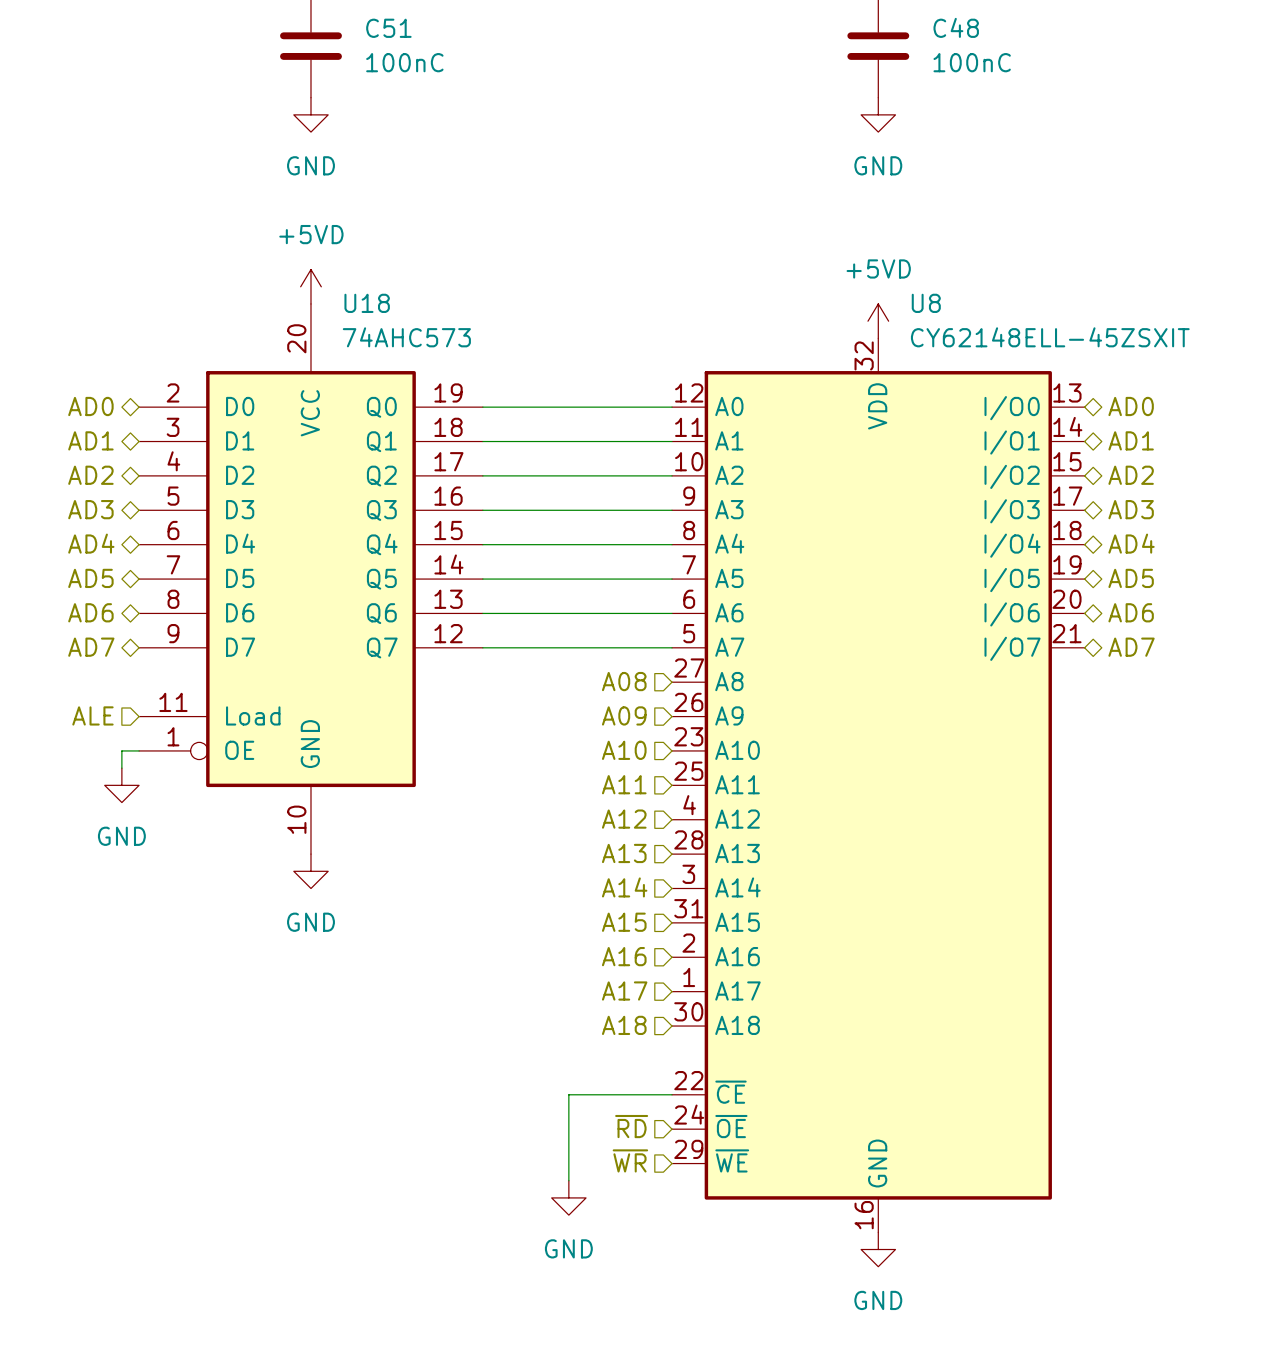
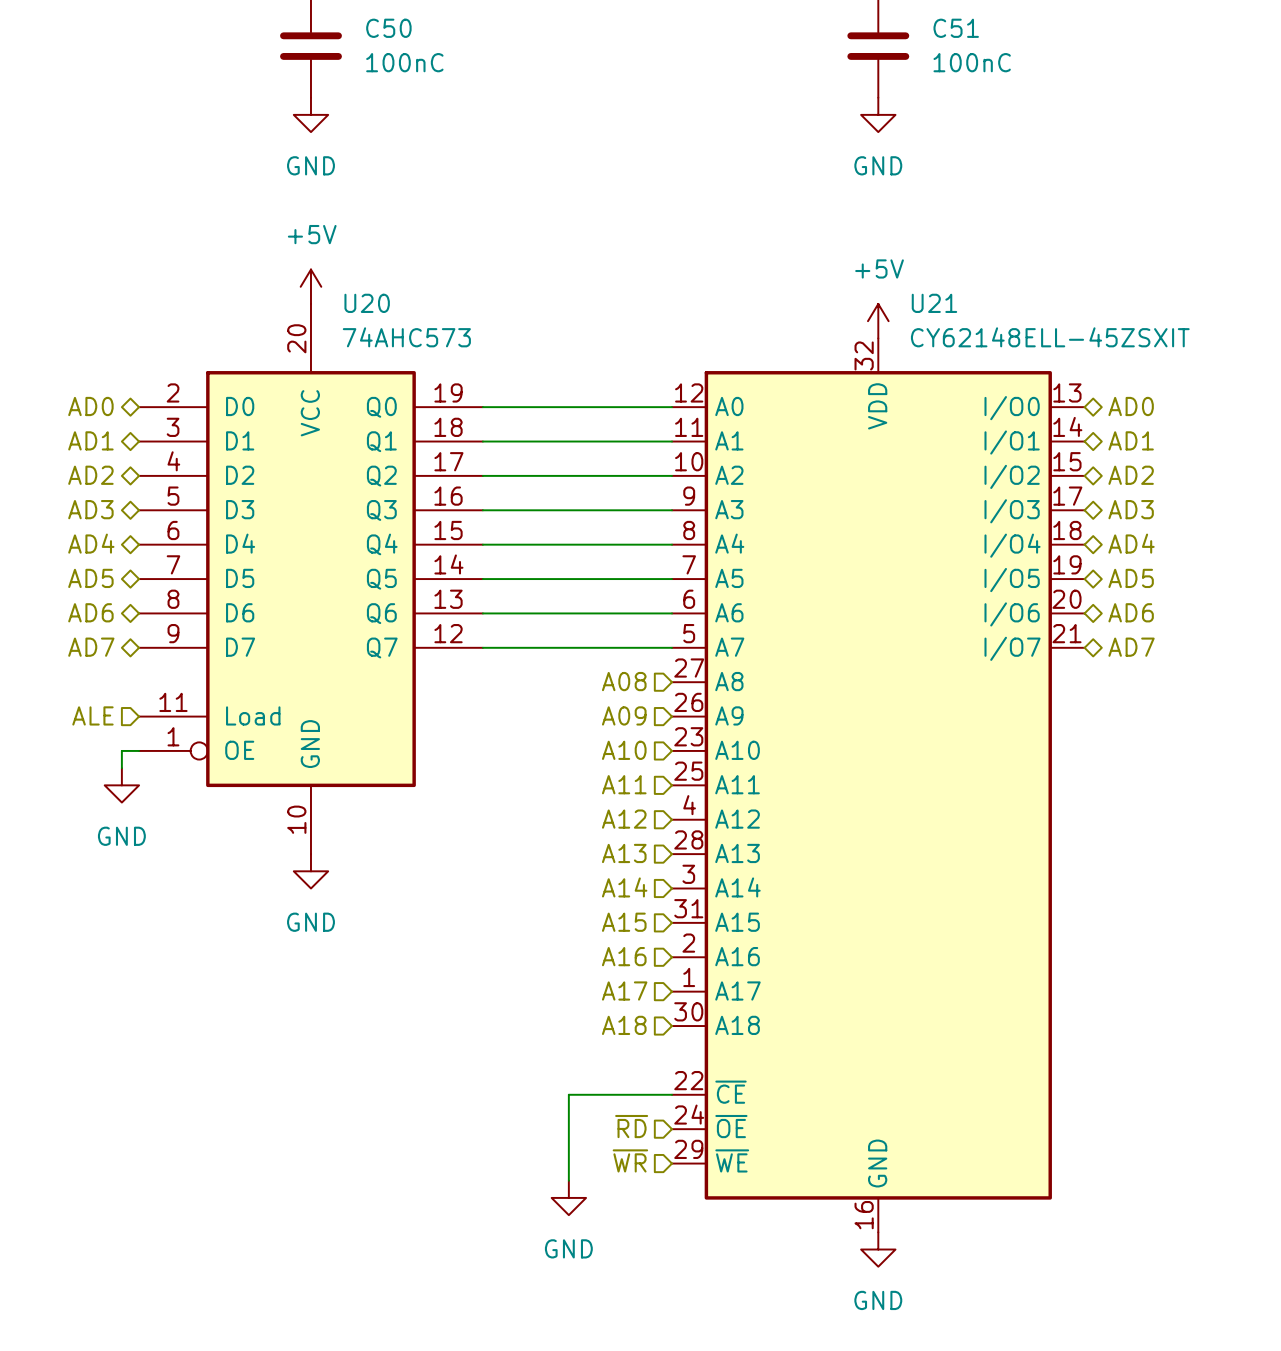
C48 name: C48 (956, 27) -> C51 (956, 28)
C51 name: C51 (388, 28) -> C50 (388, 28)
power symbol: +5VD (310, 286) -> +5V (310, 286)
U18 name: U18 (367, 303) -> U20 (367, 303)
U8 name: U8 (926, 303) -> U21 (934, 303)
power symbol: +5VD (878, 321) -> +5V (878, 321)

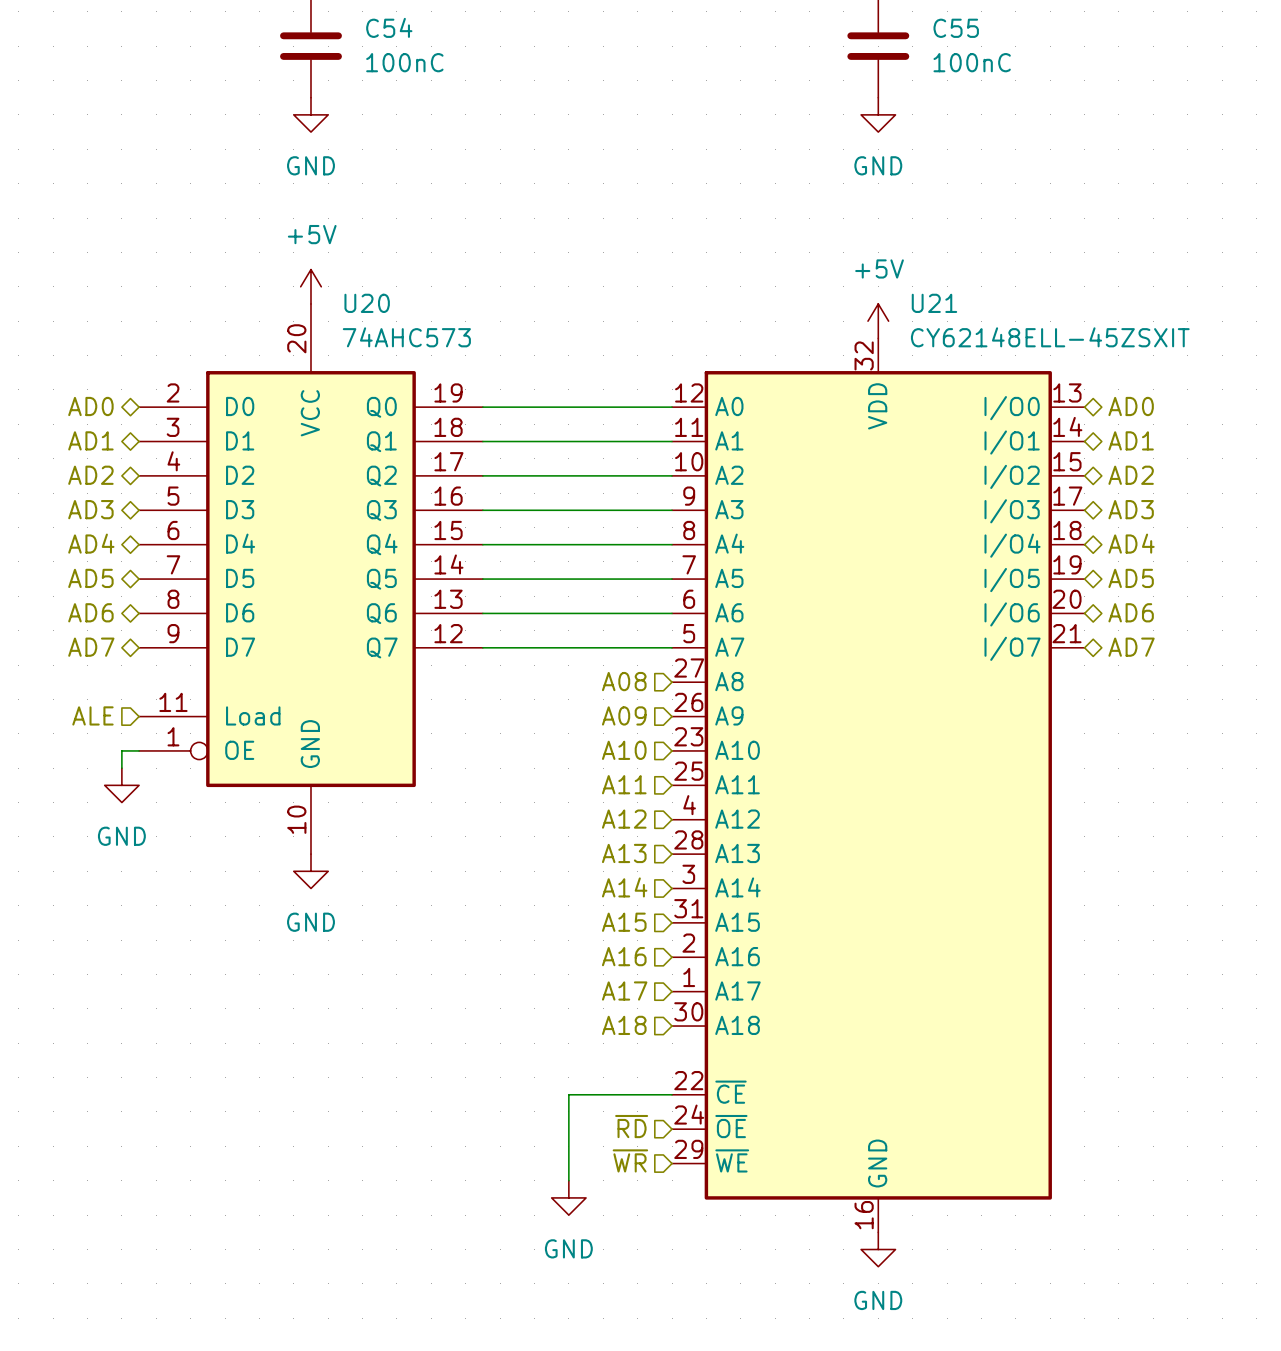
C50 name: C50 (388, 28) -> C54 (389, 27)
C51 name: C51 (956, 28) -> C55 (956, 28)

